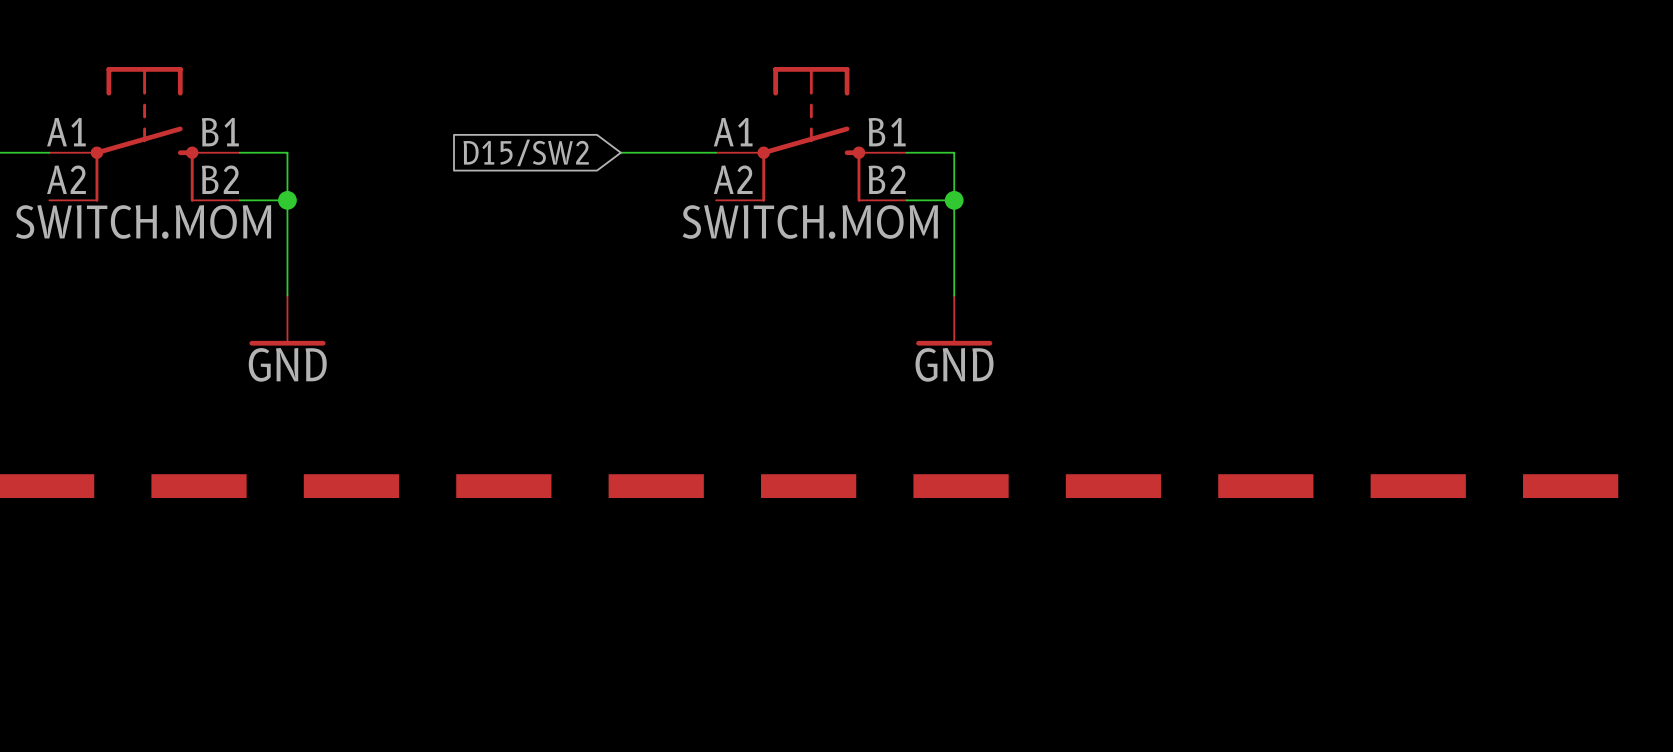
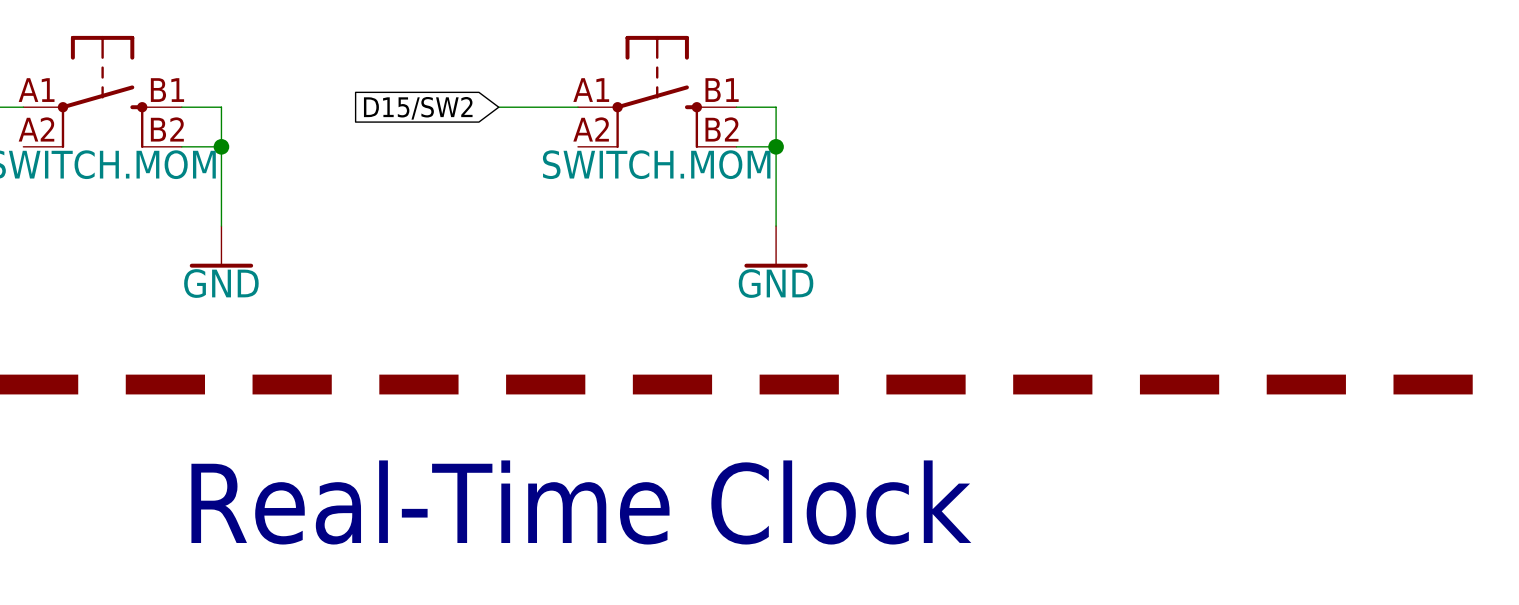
text: none -> Real-Time Clock (581, 502)

